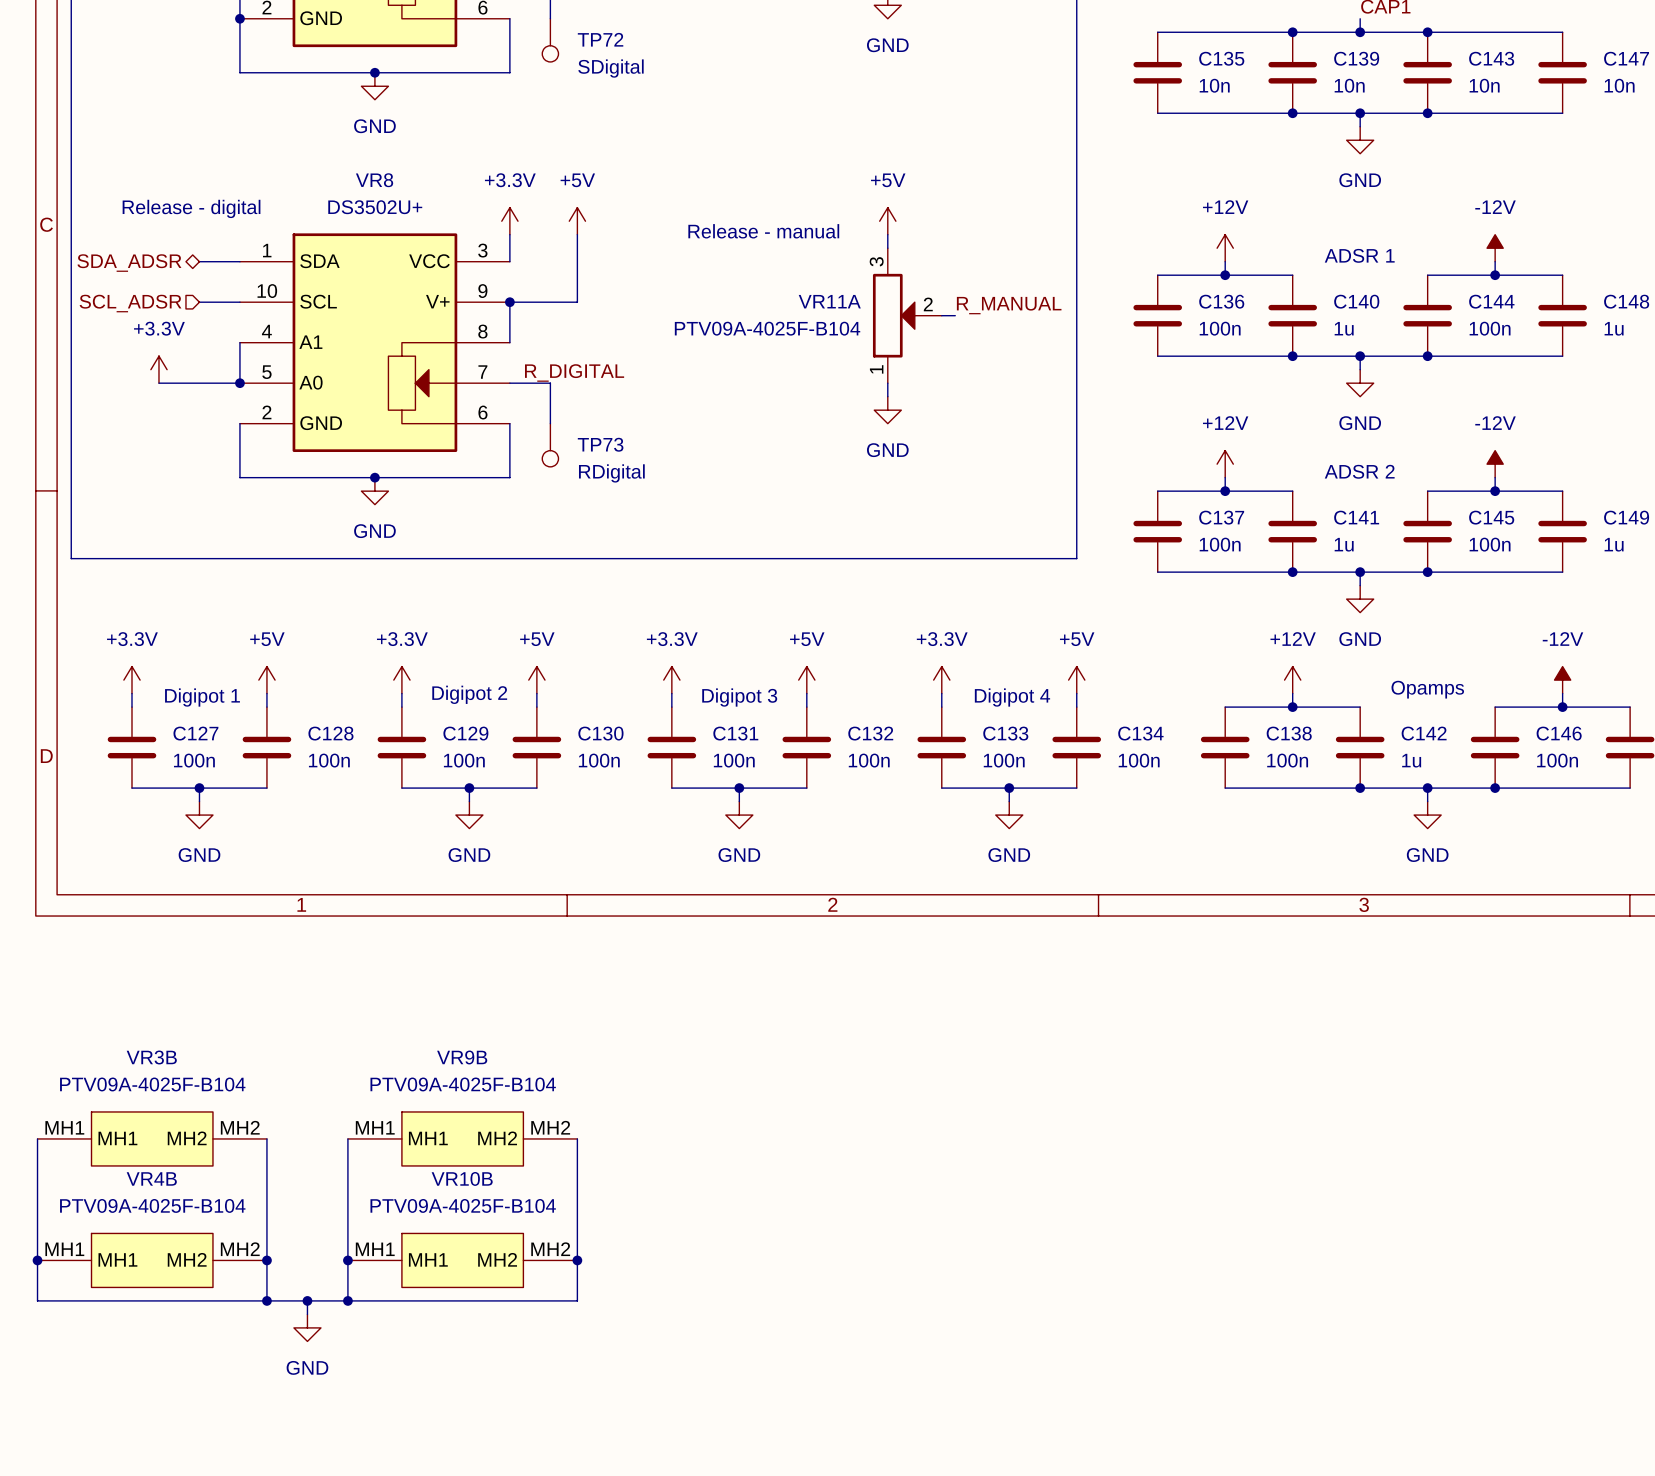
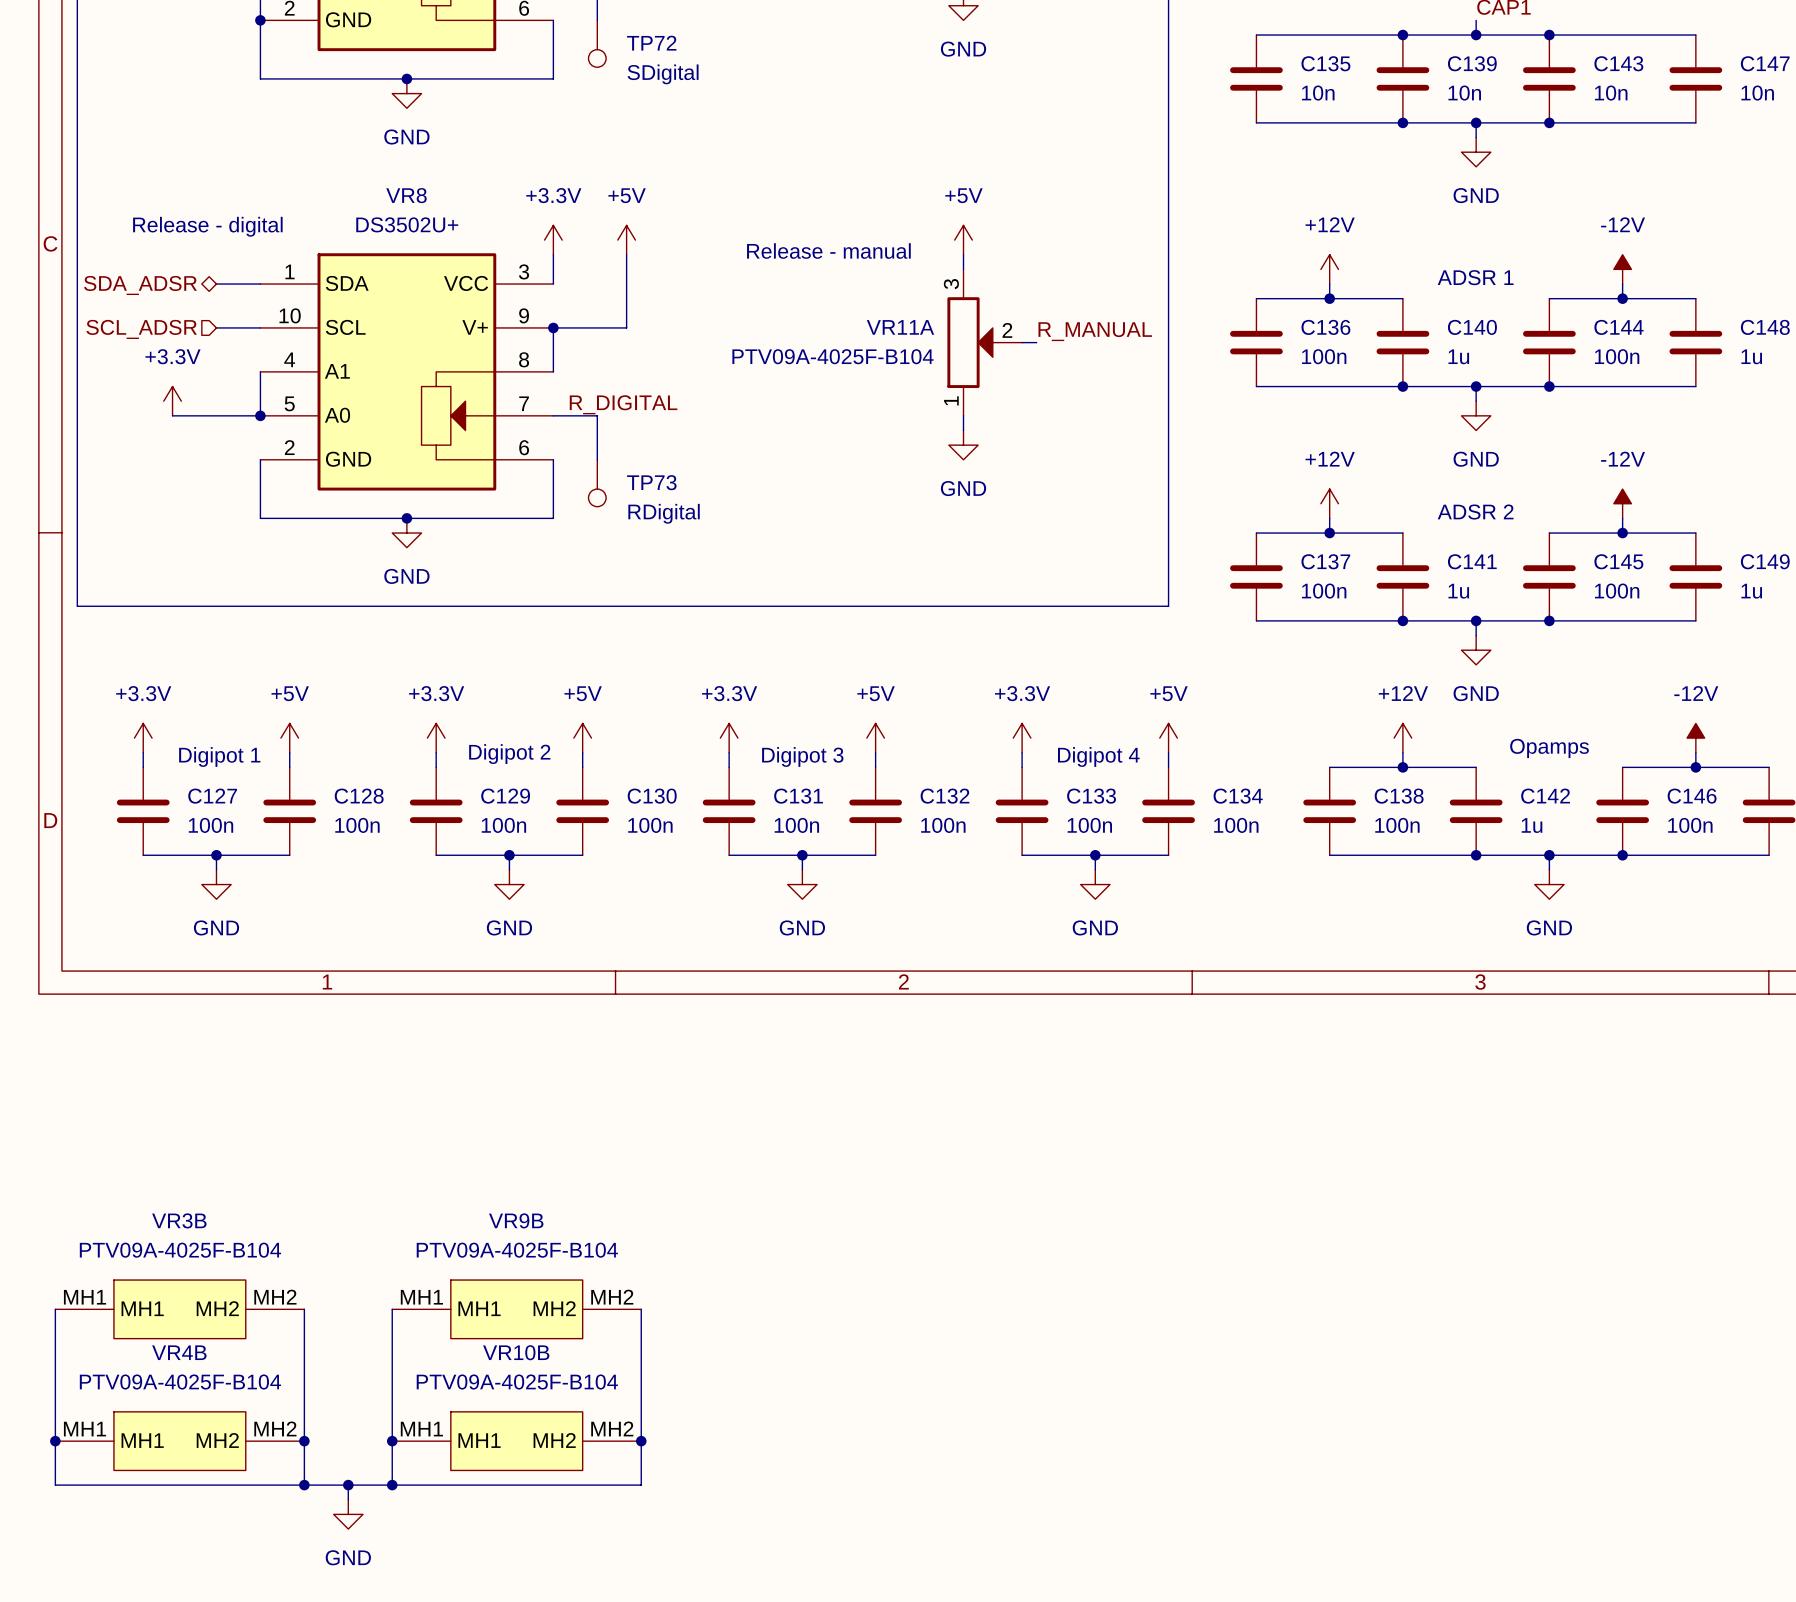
wire: (37, 1138) (37, 1300) (577, 1300) (577, 1138) -> (55, 1309) (55, 1485) (641, 1485) (641, 1309)
VR3B position: (152, 1138) -> (179, 1309)
wire: (266, 1138) (266, 1300) -> (304, 1309) (304, 1485)
wire: (347, 1138) (347, 1300) -> (392, 1309) (392, 1485)
VR9B position: (462, 1138) -> (516, 1309)
junction: (37, 1260) -> none
VR4B position: (152, 1260) -> (179, 1441)
junction: (266, 1260) -> none
junction: (347, 1260) -> none
VR10B position: (462, 1260) -> (516, 1441)
junction: (577, 1260) -> none
junction: (266, 1300) -> none
wire: (307, 1300) (307, 1314) -> (348, 1485) (348, 1499)
junction: (307, 1300) -> none
junction: (347, 1300) -> none
junction: none -> (55, 1441)
junction: none -> (304, 1441)
power symbol position: GND (307, 1327) -> GND (348, 1514)
junction: none -> (392, 1441)
junction: none -> (641, 1441)
junction: none -> (304, 1485)
junction: none -> (348, 1485)
junction: none -> (392, 1485)

